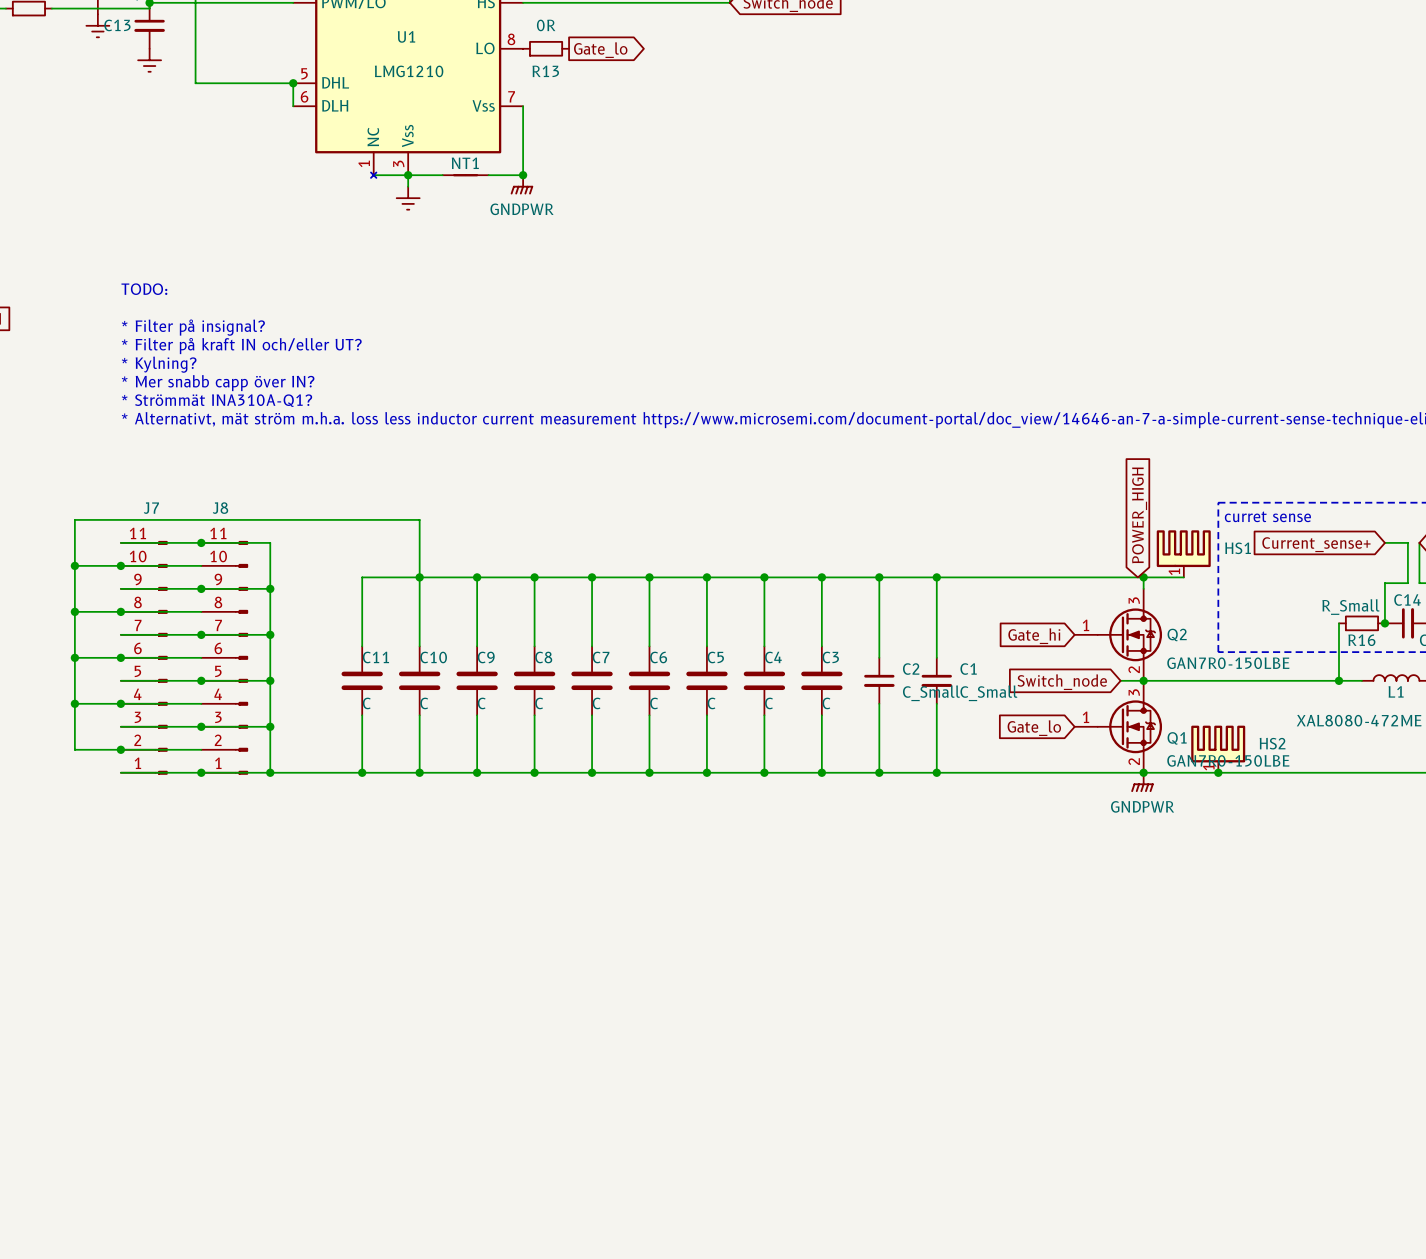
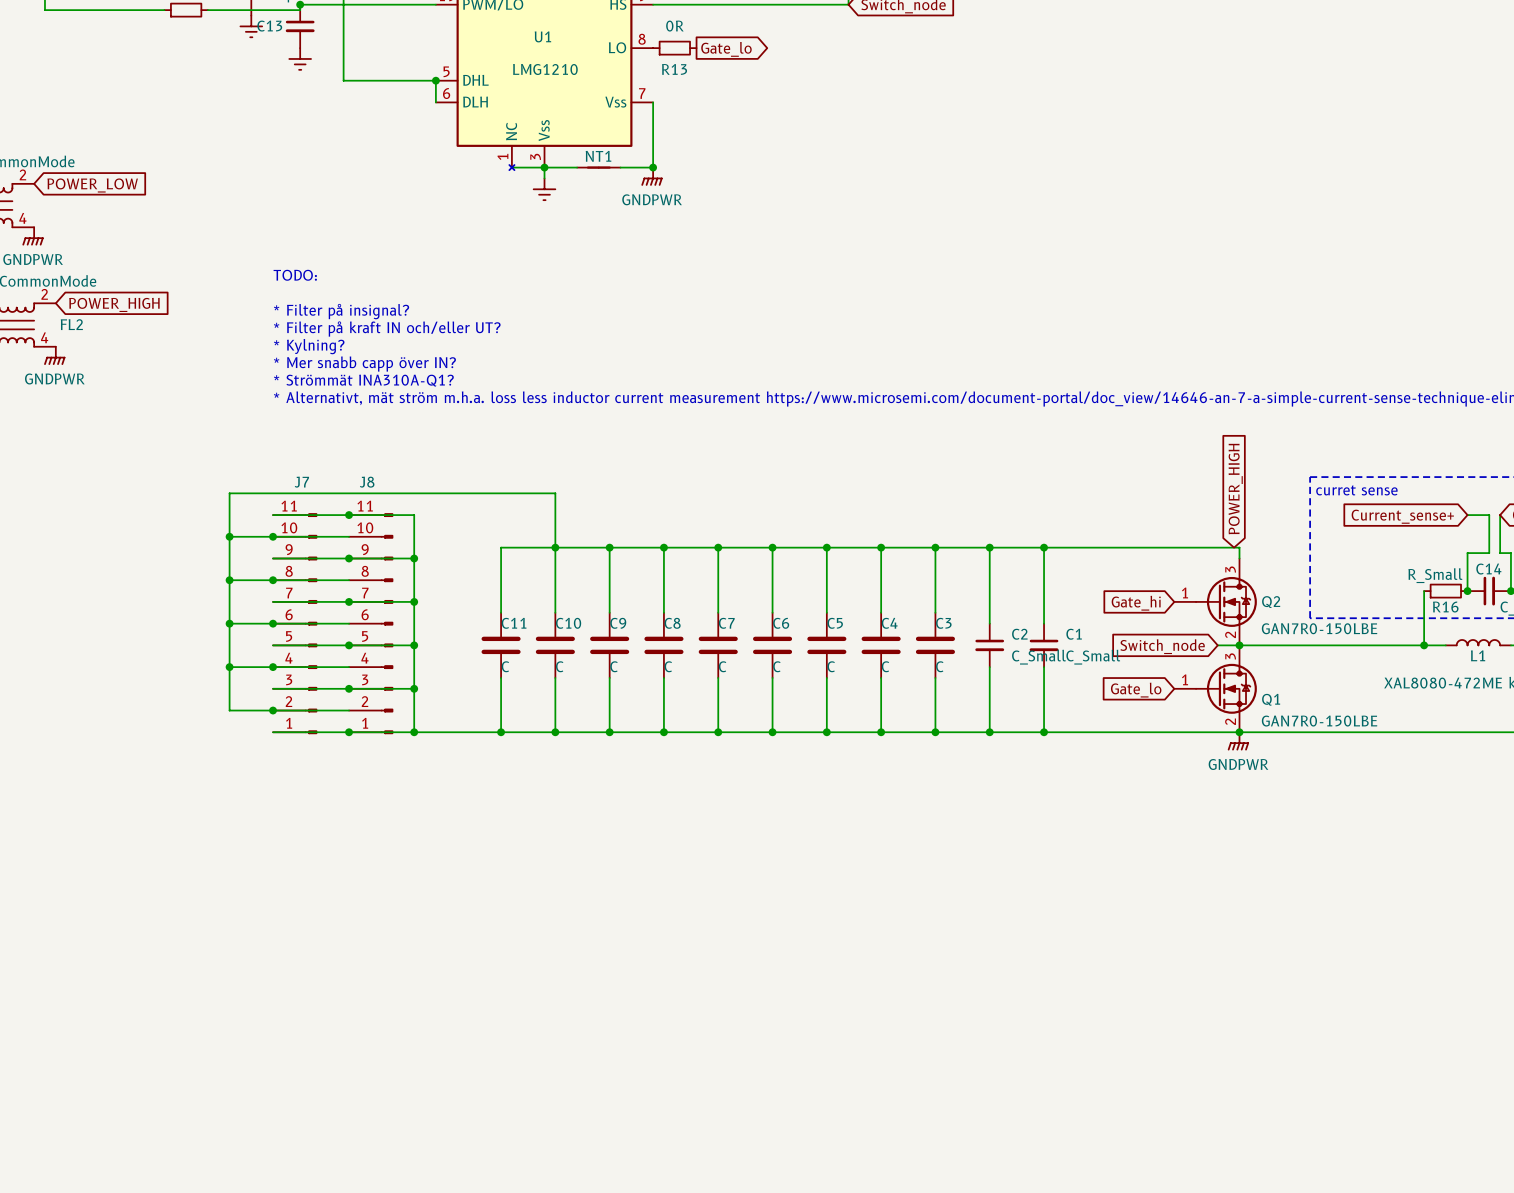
HS1: (1183, 553) -> none
wire: (1143, 577) (1183, 577) -> none
junction: (1143, 577) -> none
HS2: (1218, 749) -> none
junction: (1218, 772) -> none

